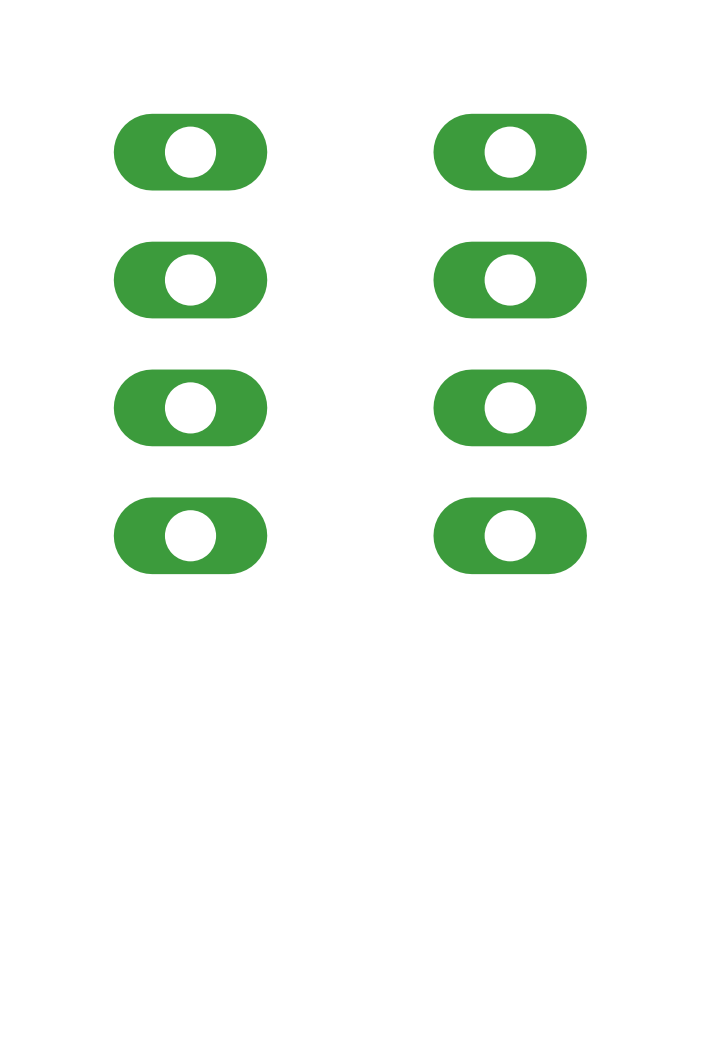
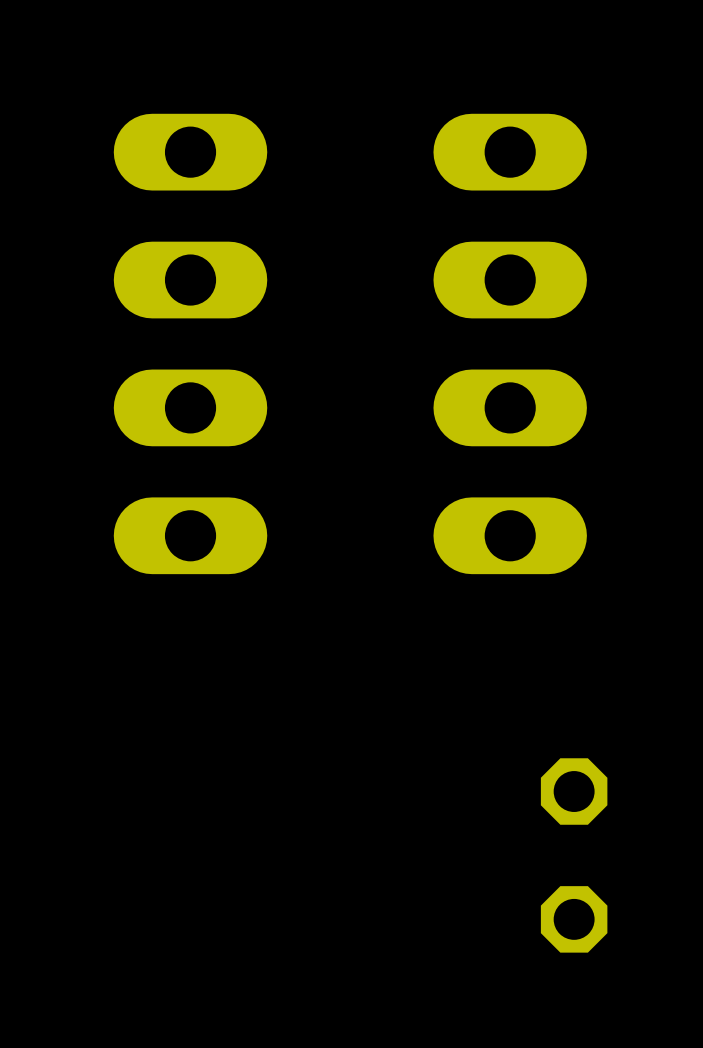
part: none -> (574, 855)

